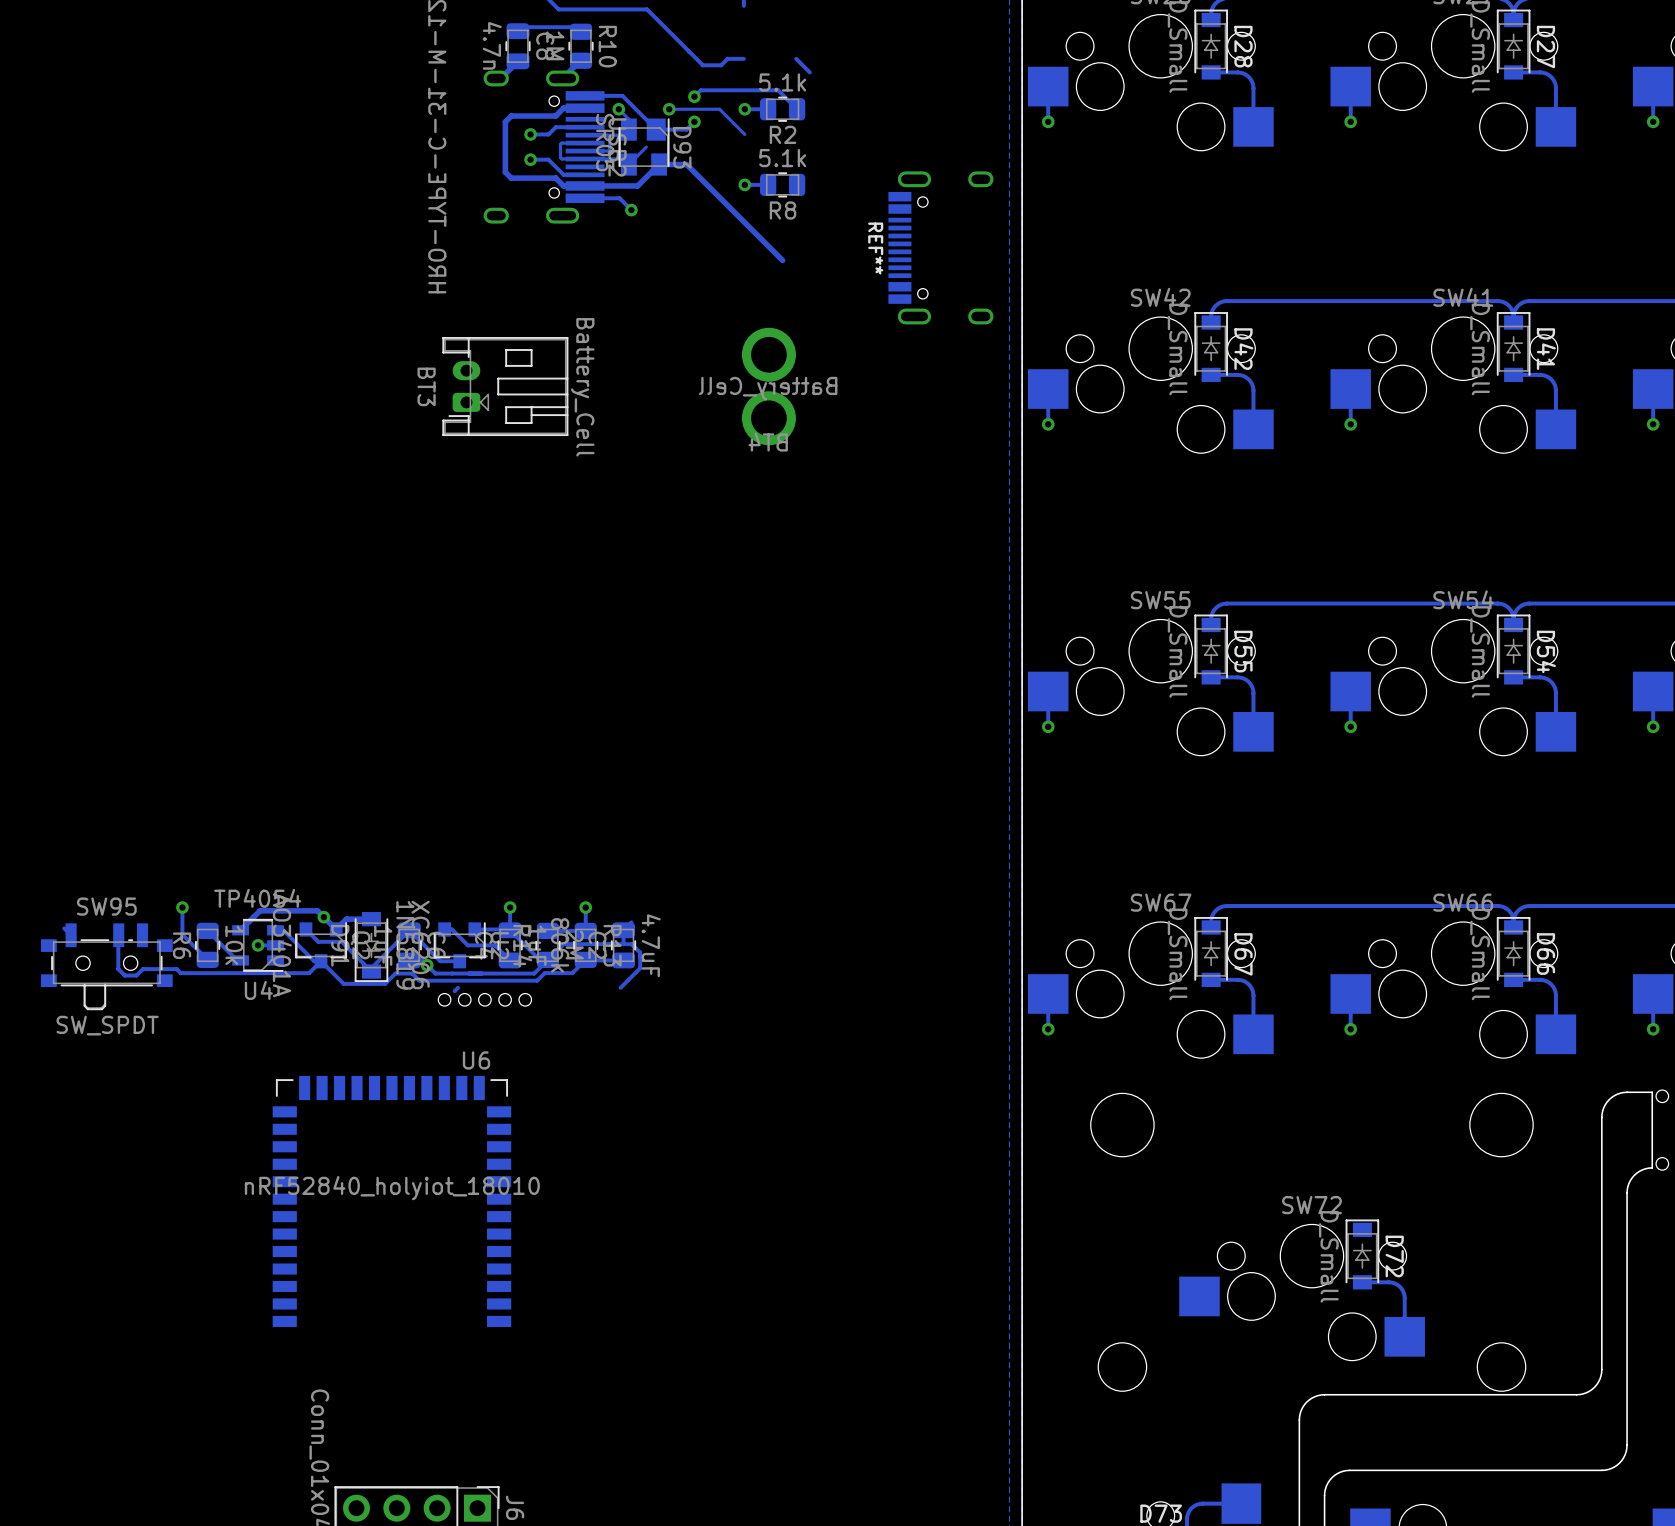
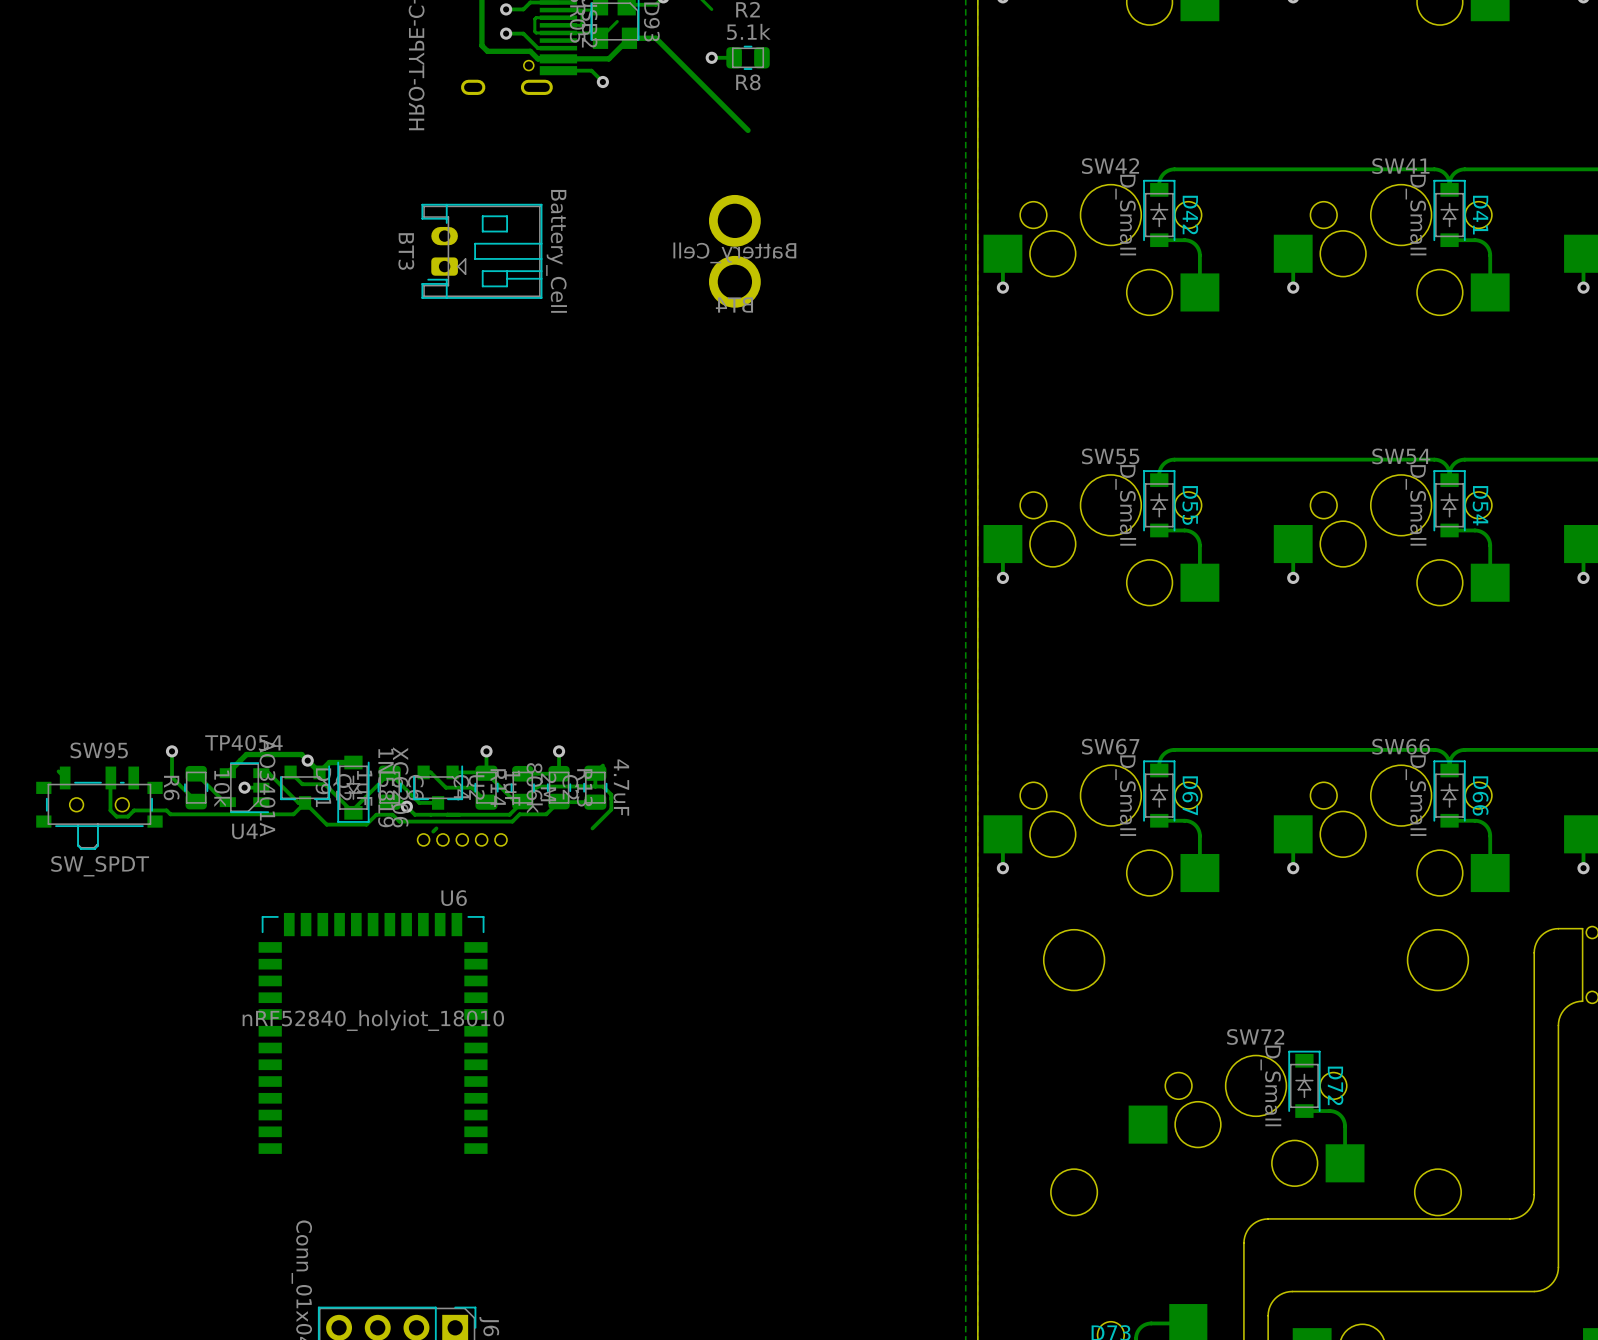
REF**: (940, 247) -> none

